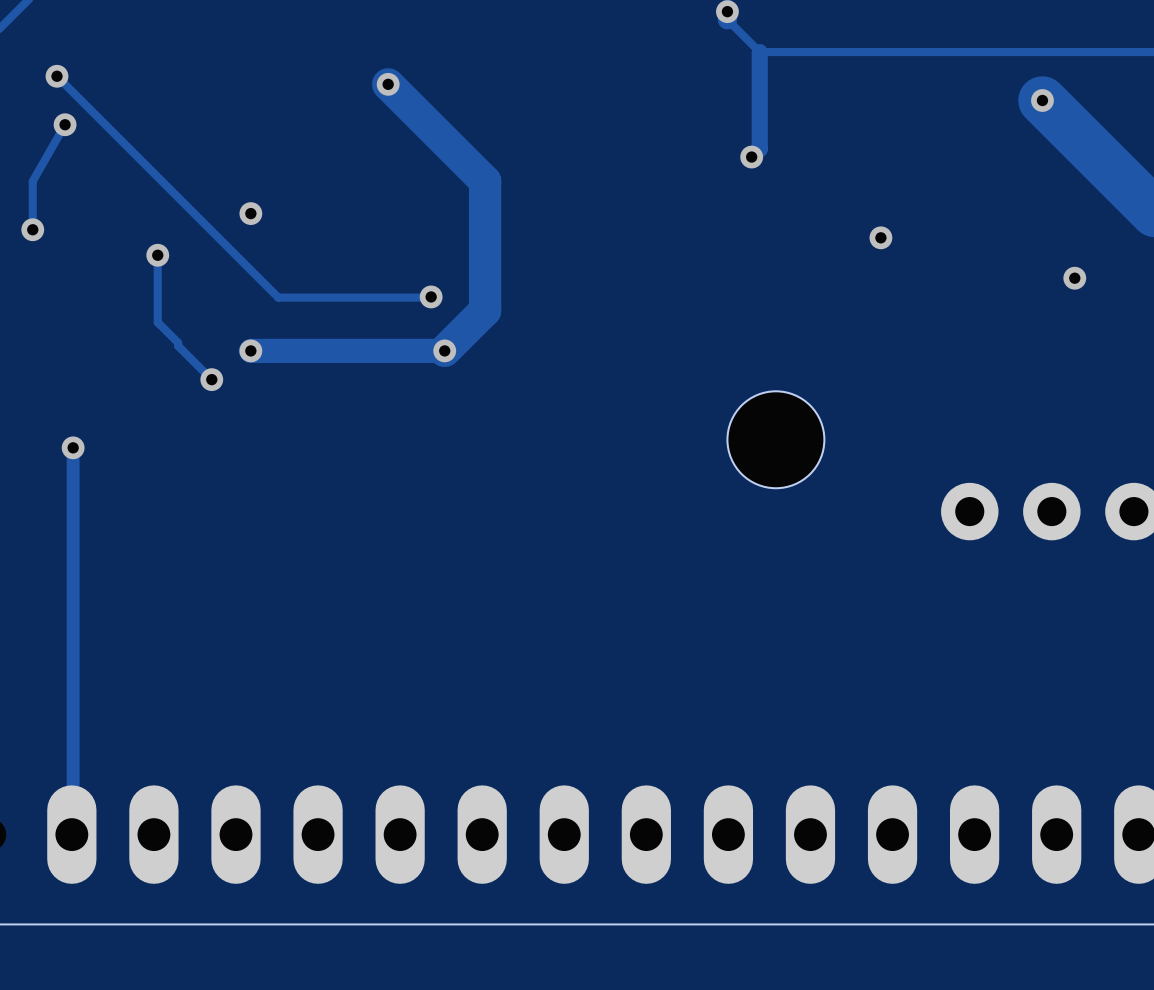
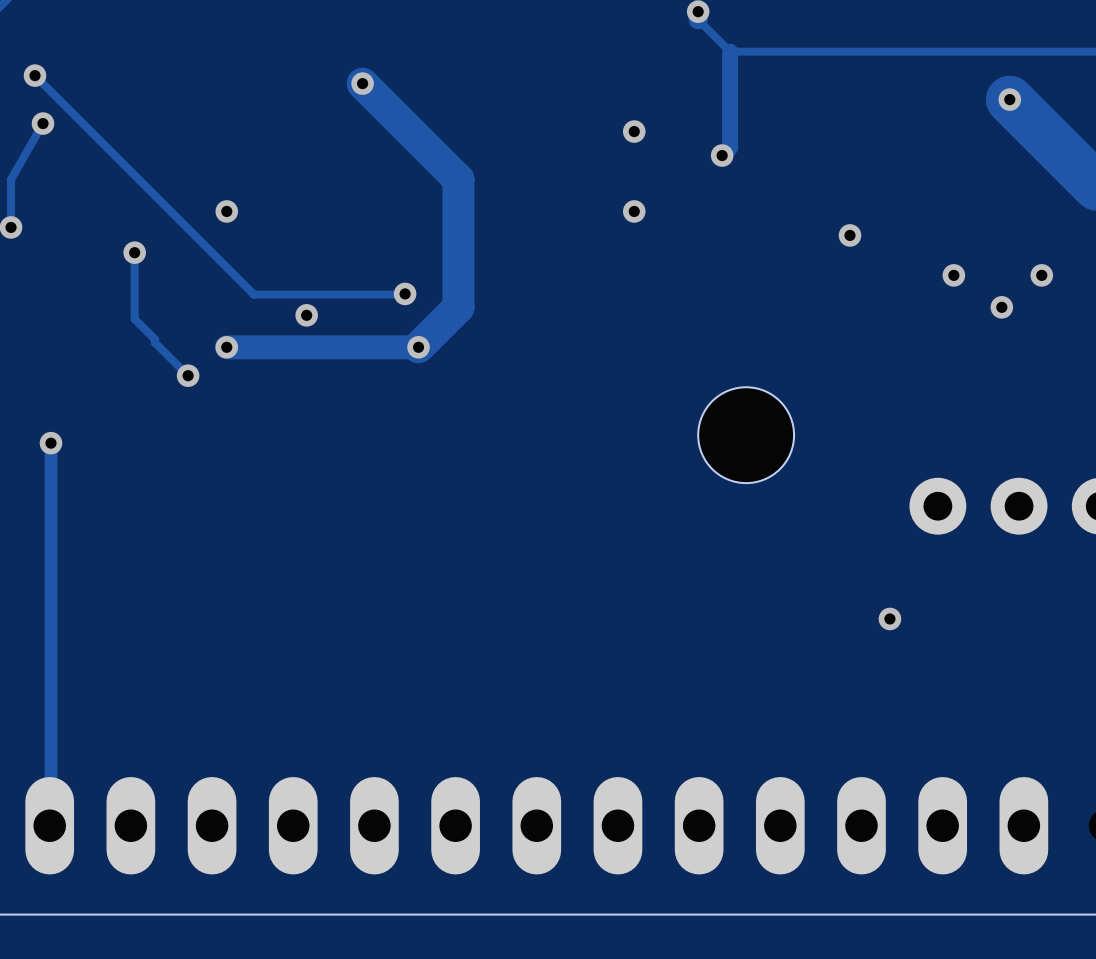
via: none -> (634, 131)
via: none -> (634, 211)
via: none -> (953, 275)
via: none -> (1001, 307)
via: none -> (306, 315)
via: none -> (889, 618)

